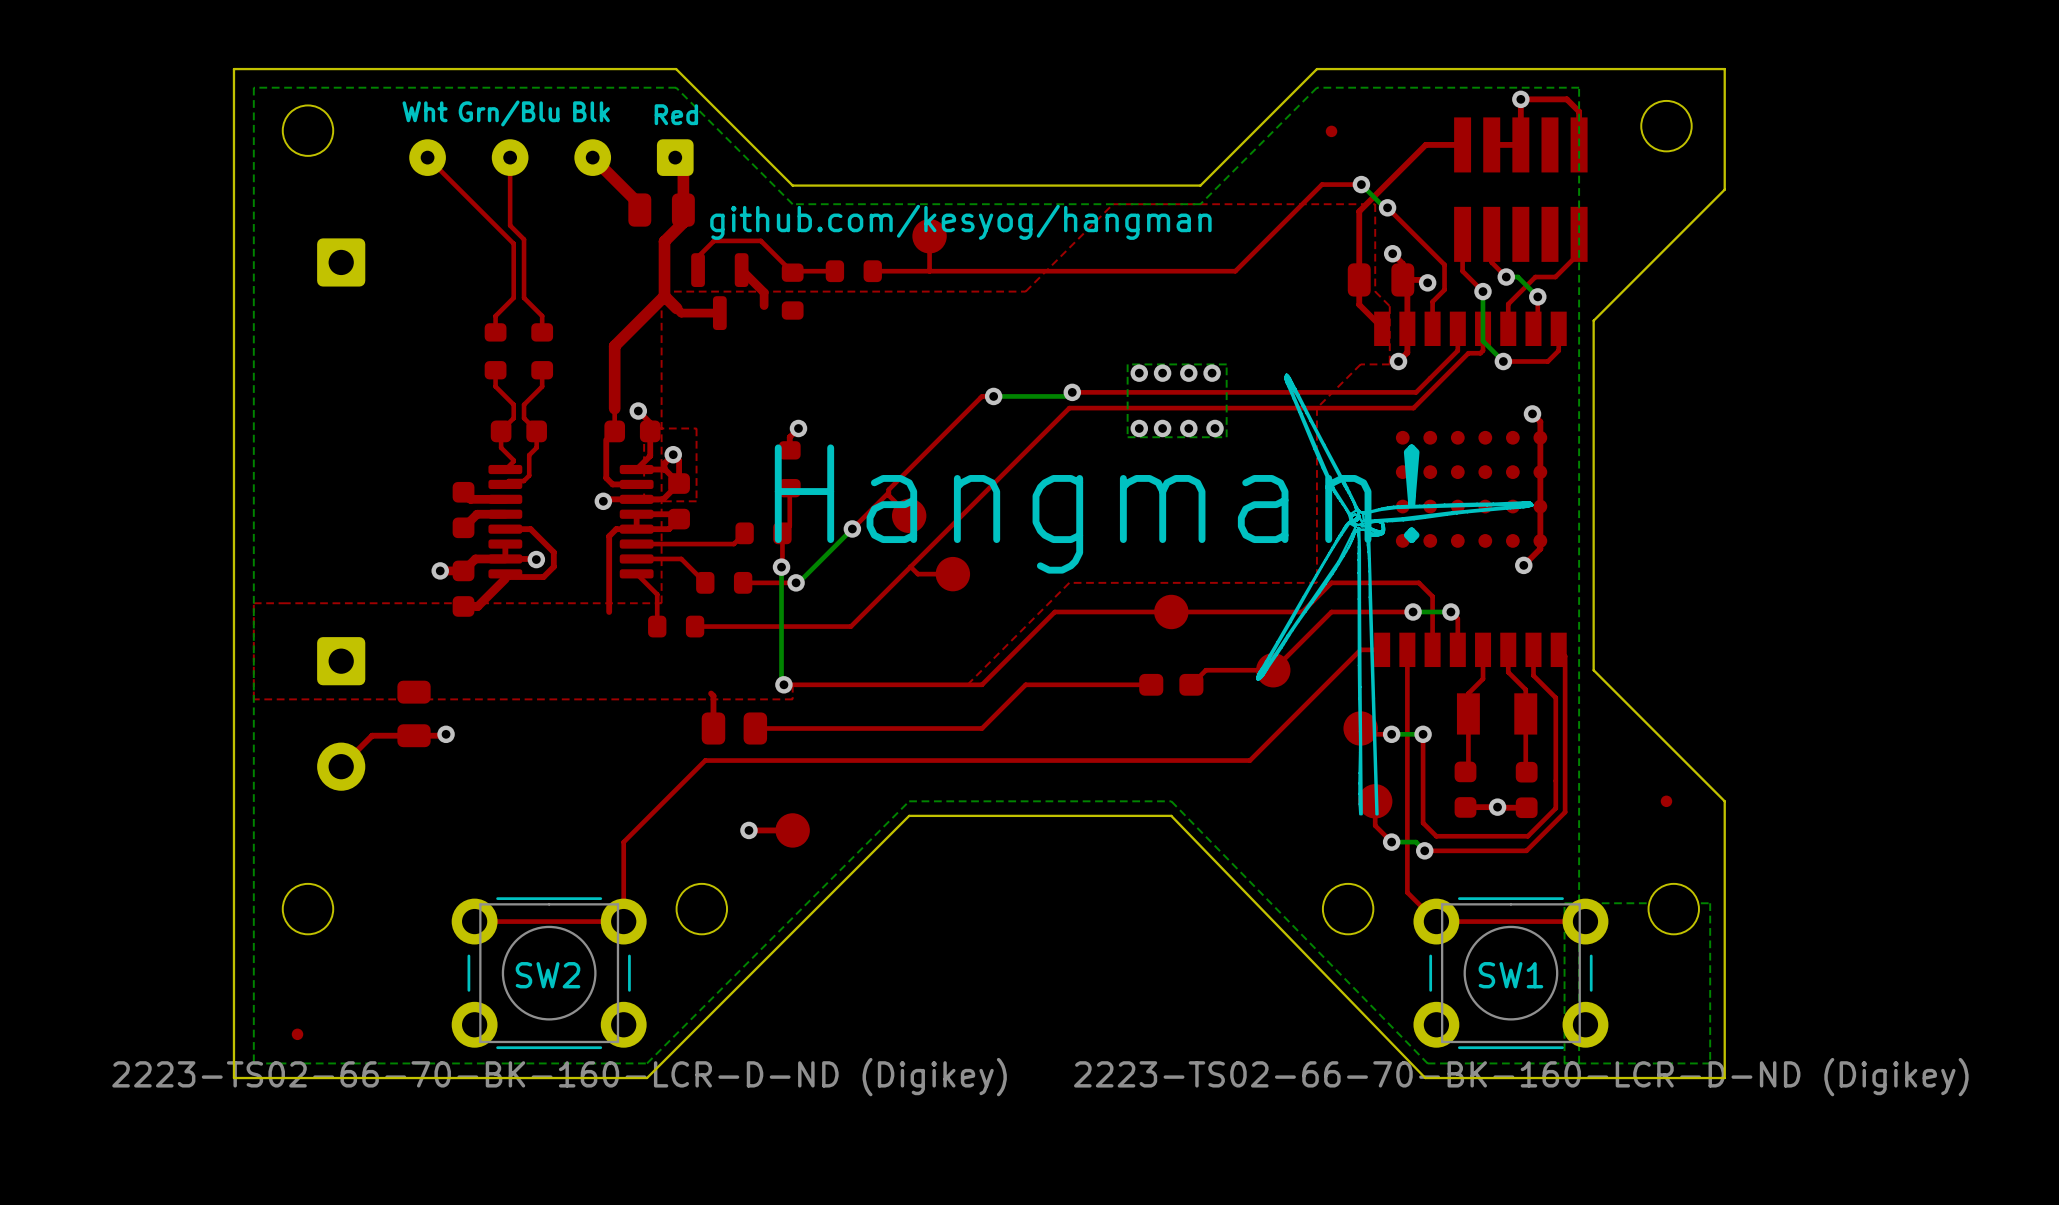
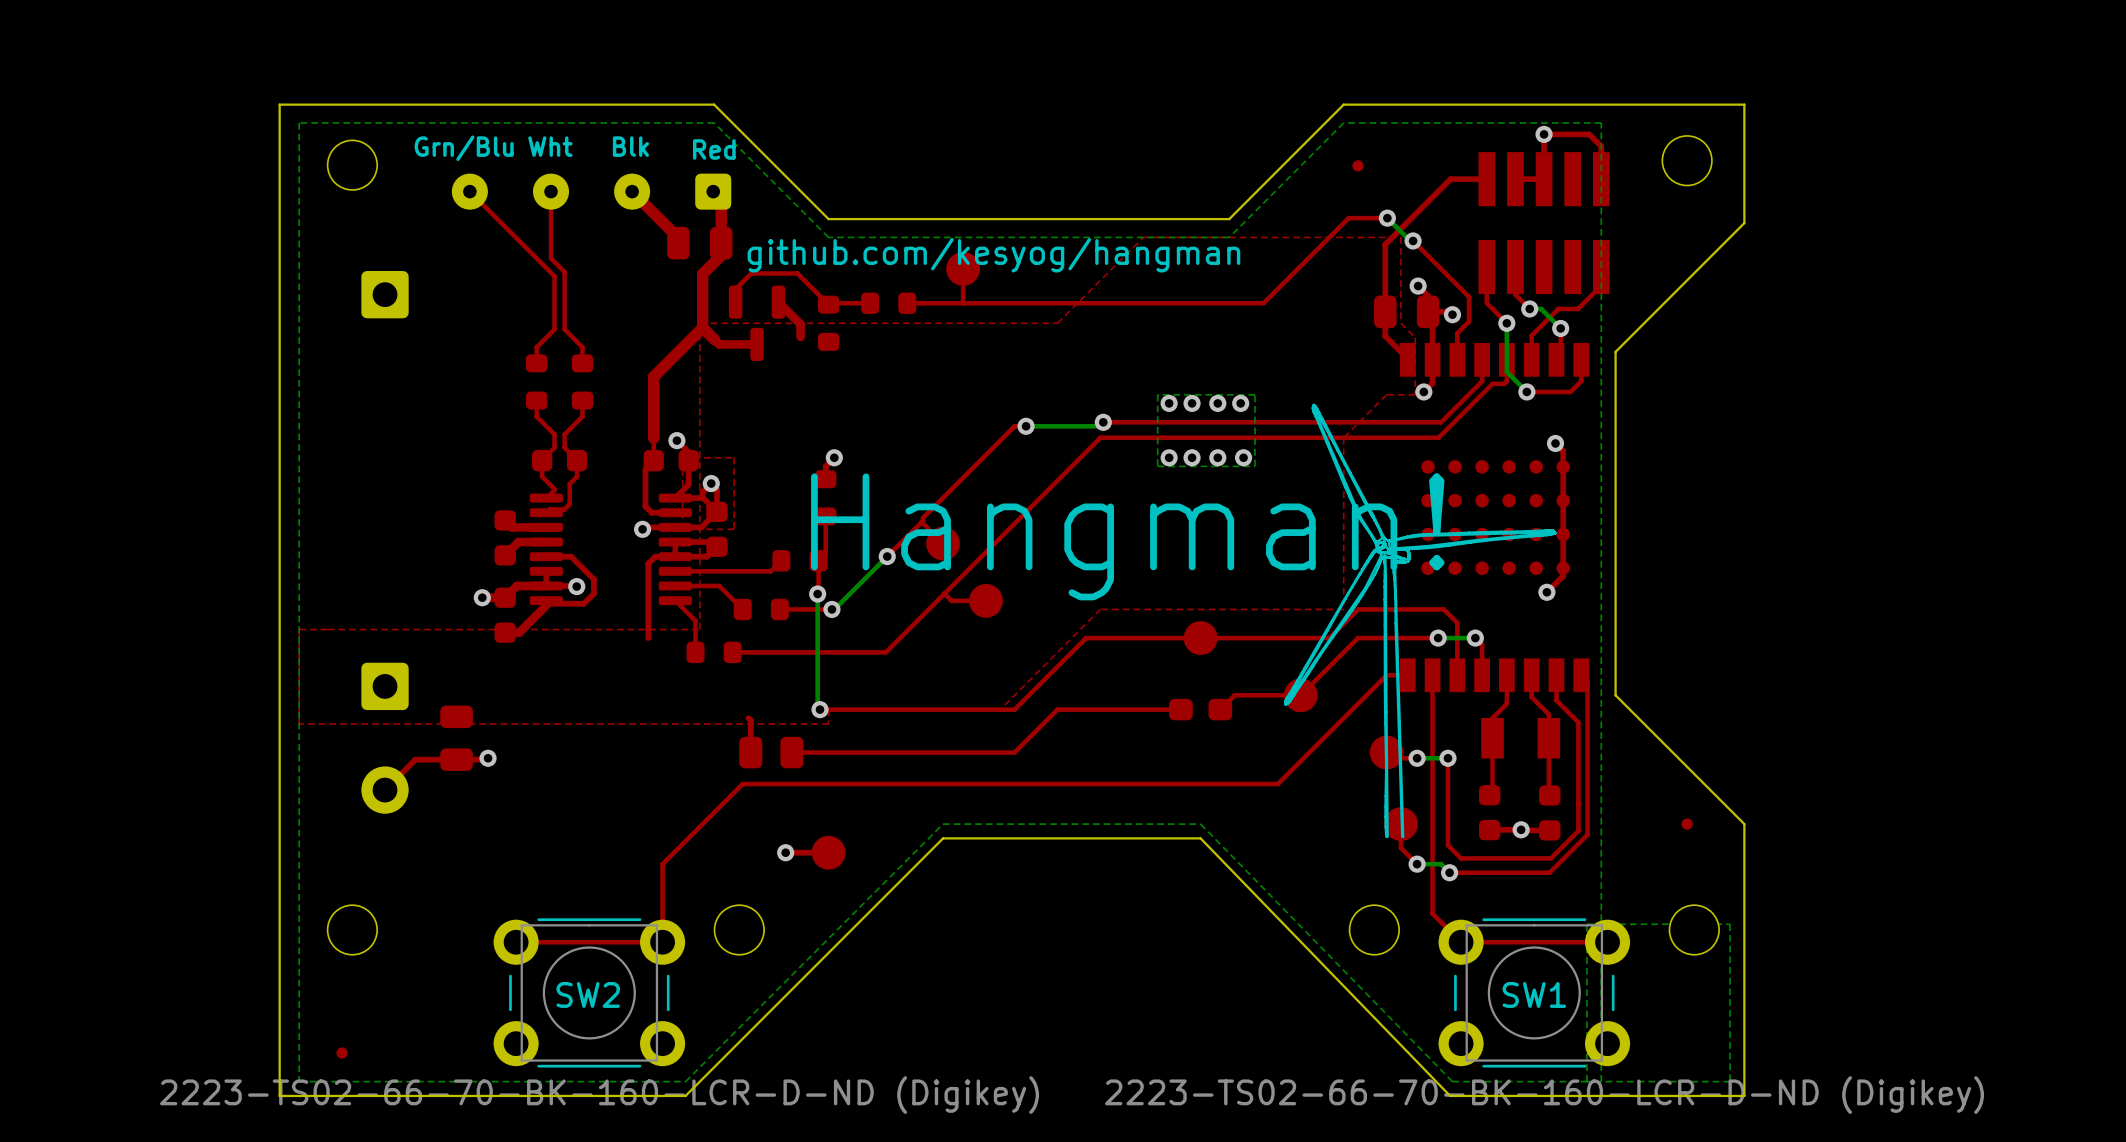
text position: Wht (425, 111) -> Wht (550, 146)
text position: Grn/Blu (509, 113) -> Grn/Blu (464, 148)

